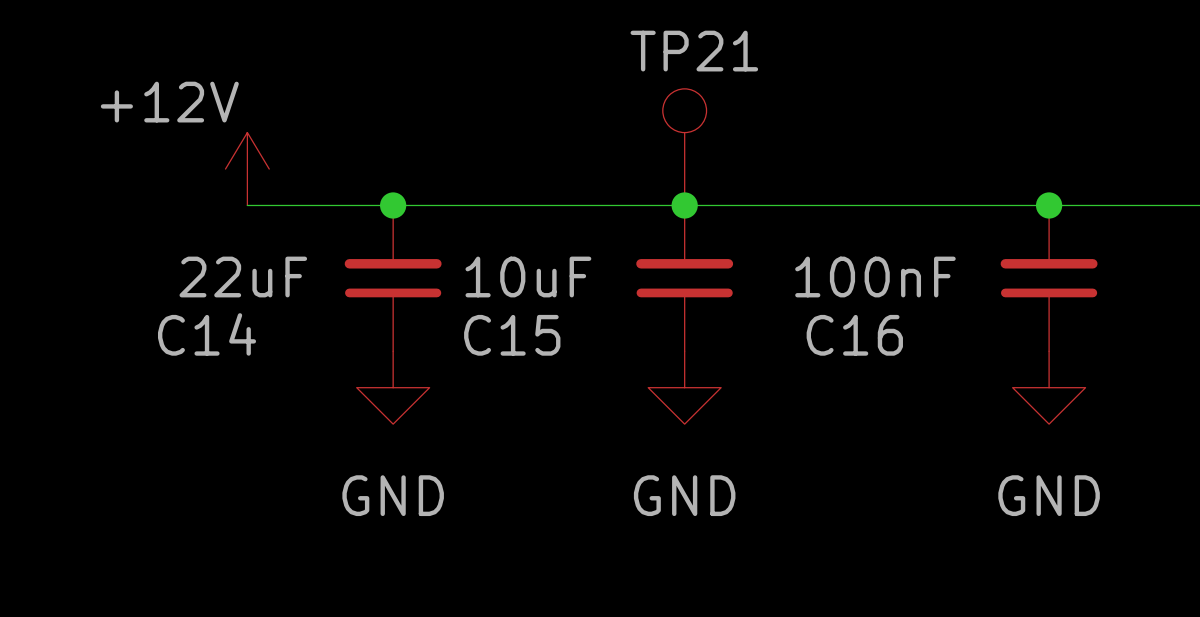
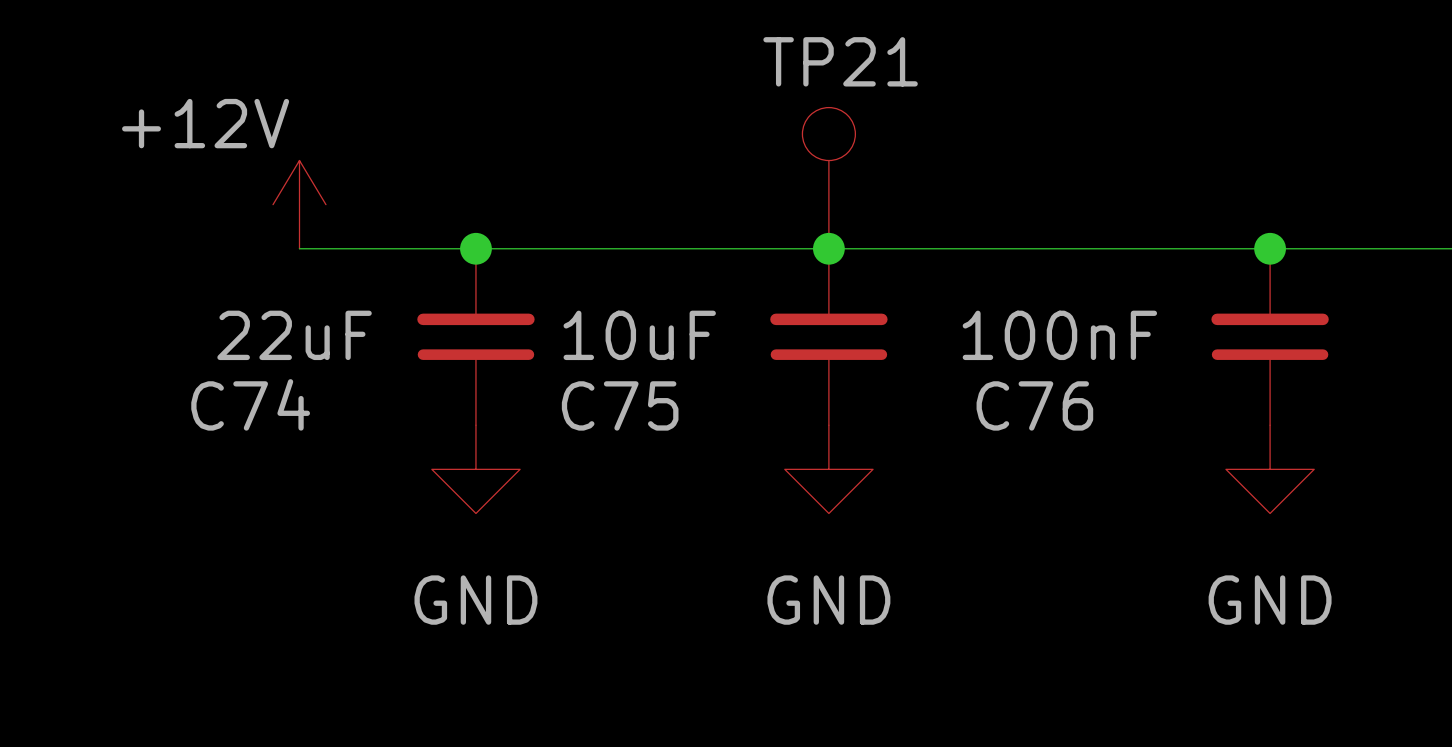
C14 name: C14 (207, 334) -> C74 (250, 404)
C15 name: C15 (512, 335) -> C75 (620, 405)
C16 name: C16 (854, 335) -> C76 (1034, 405)

